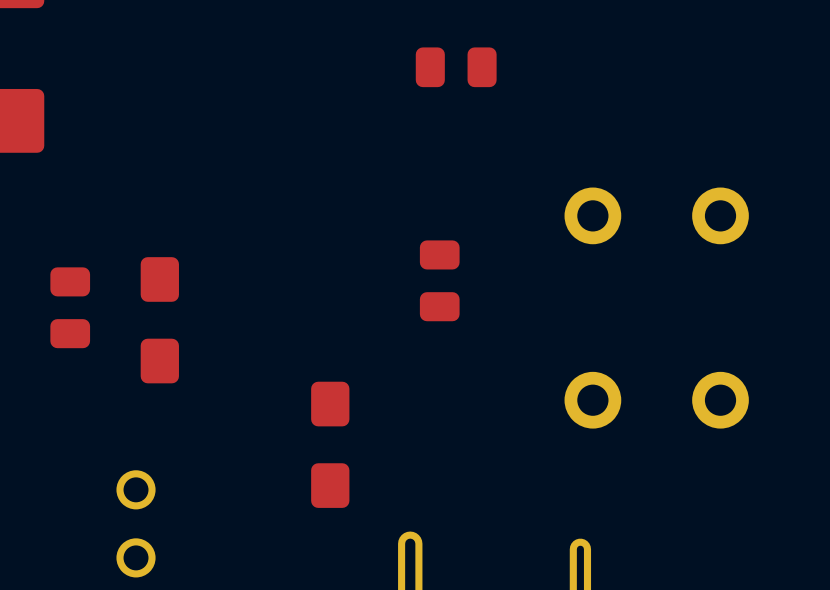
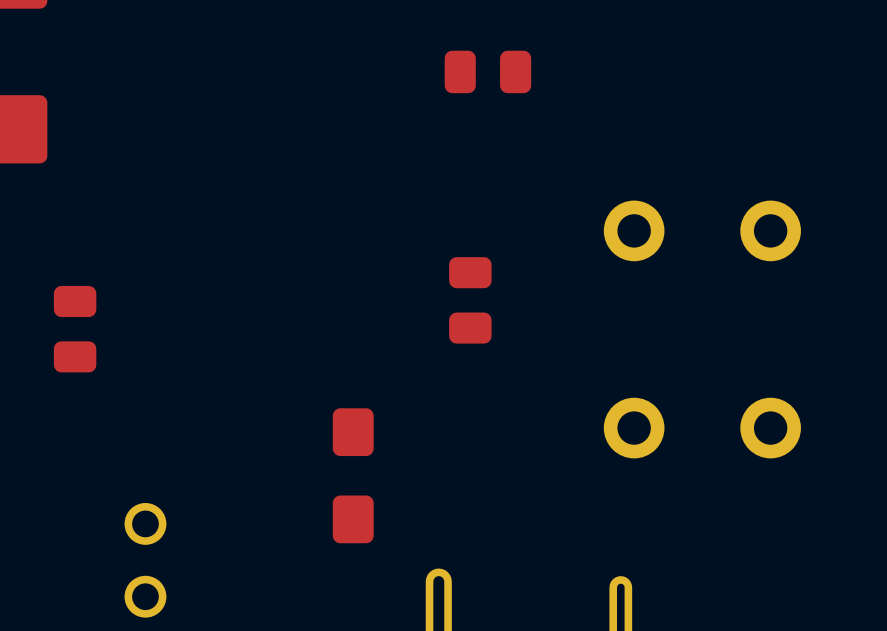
part: (159, 320) -> none

